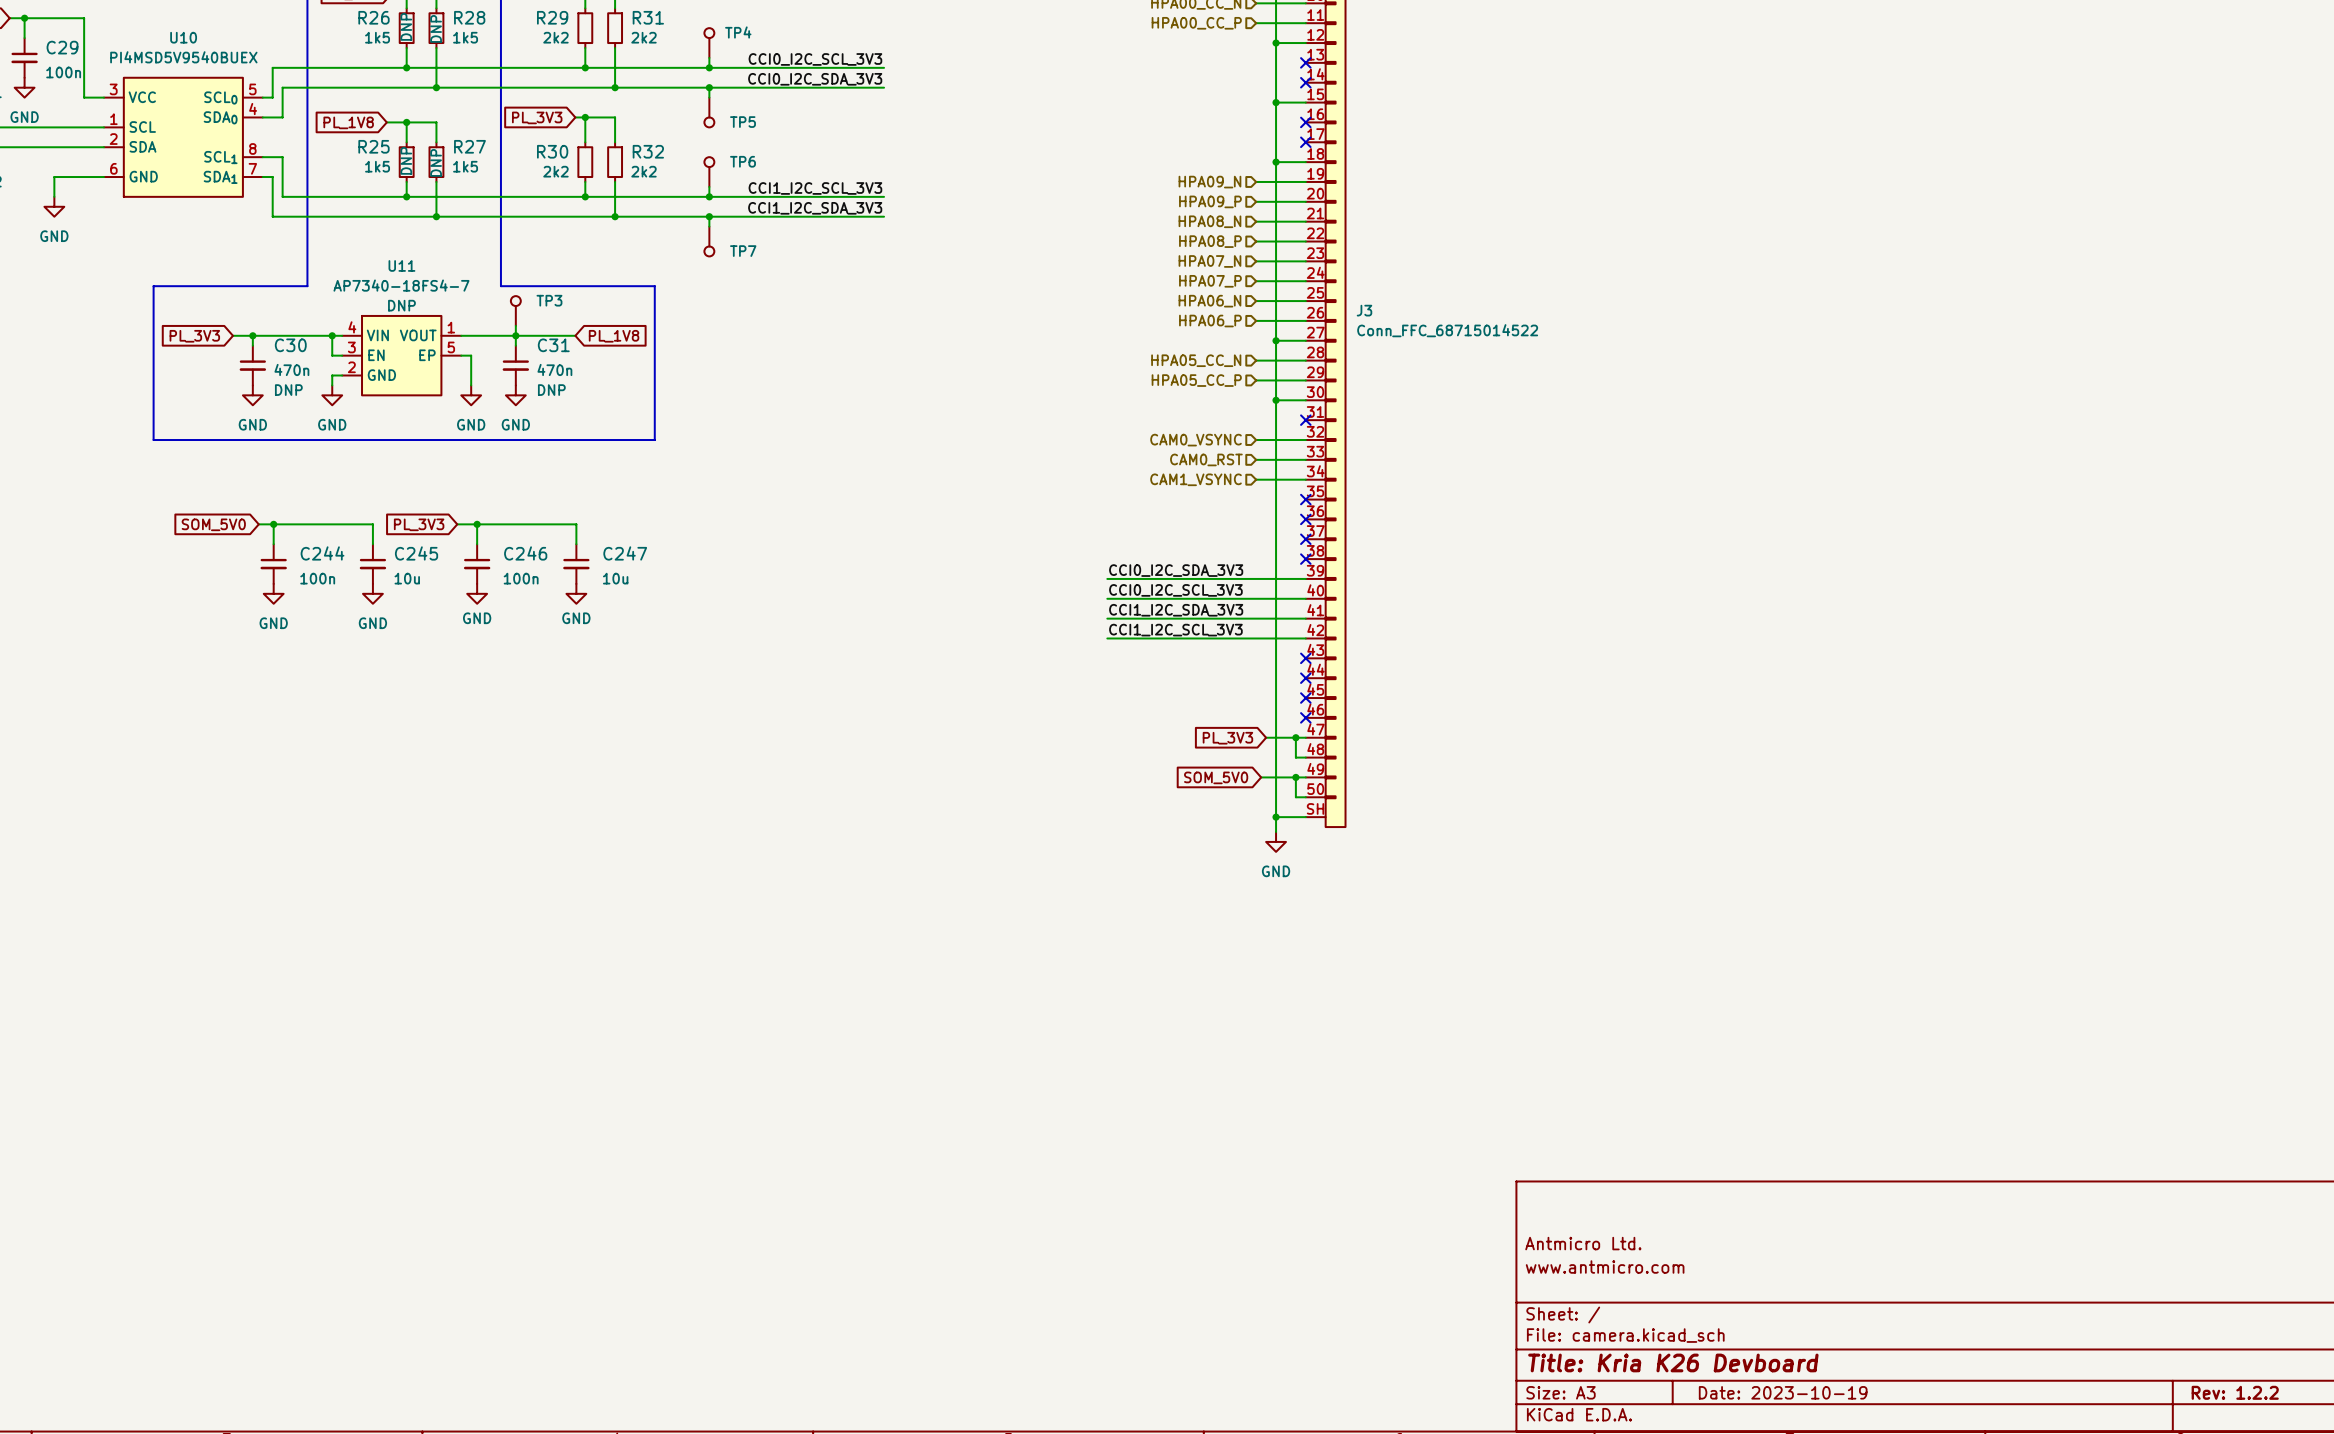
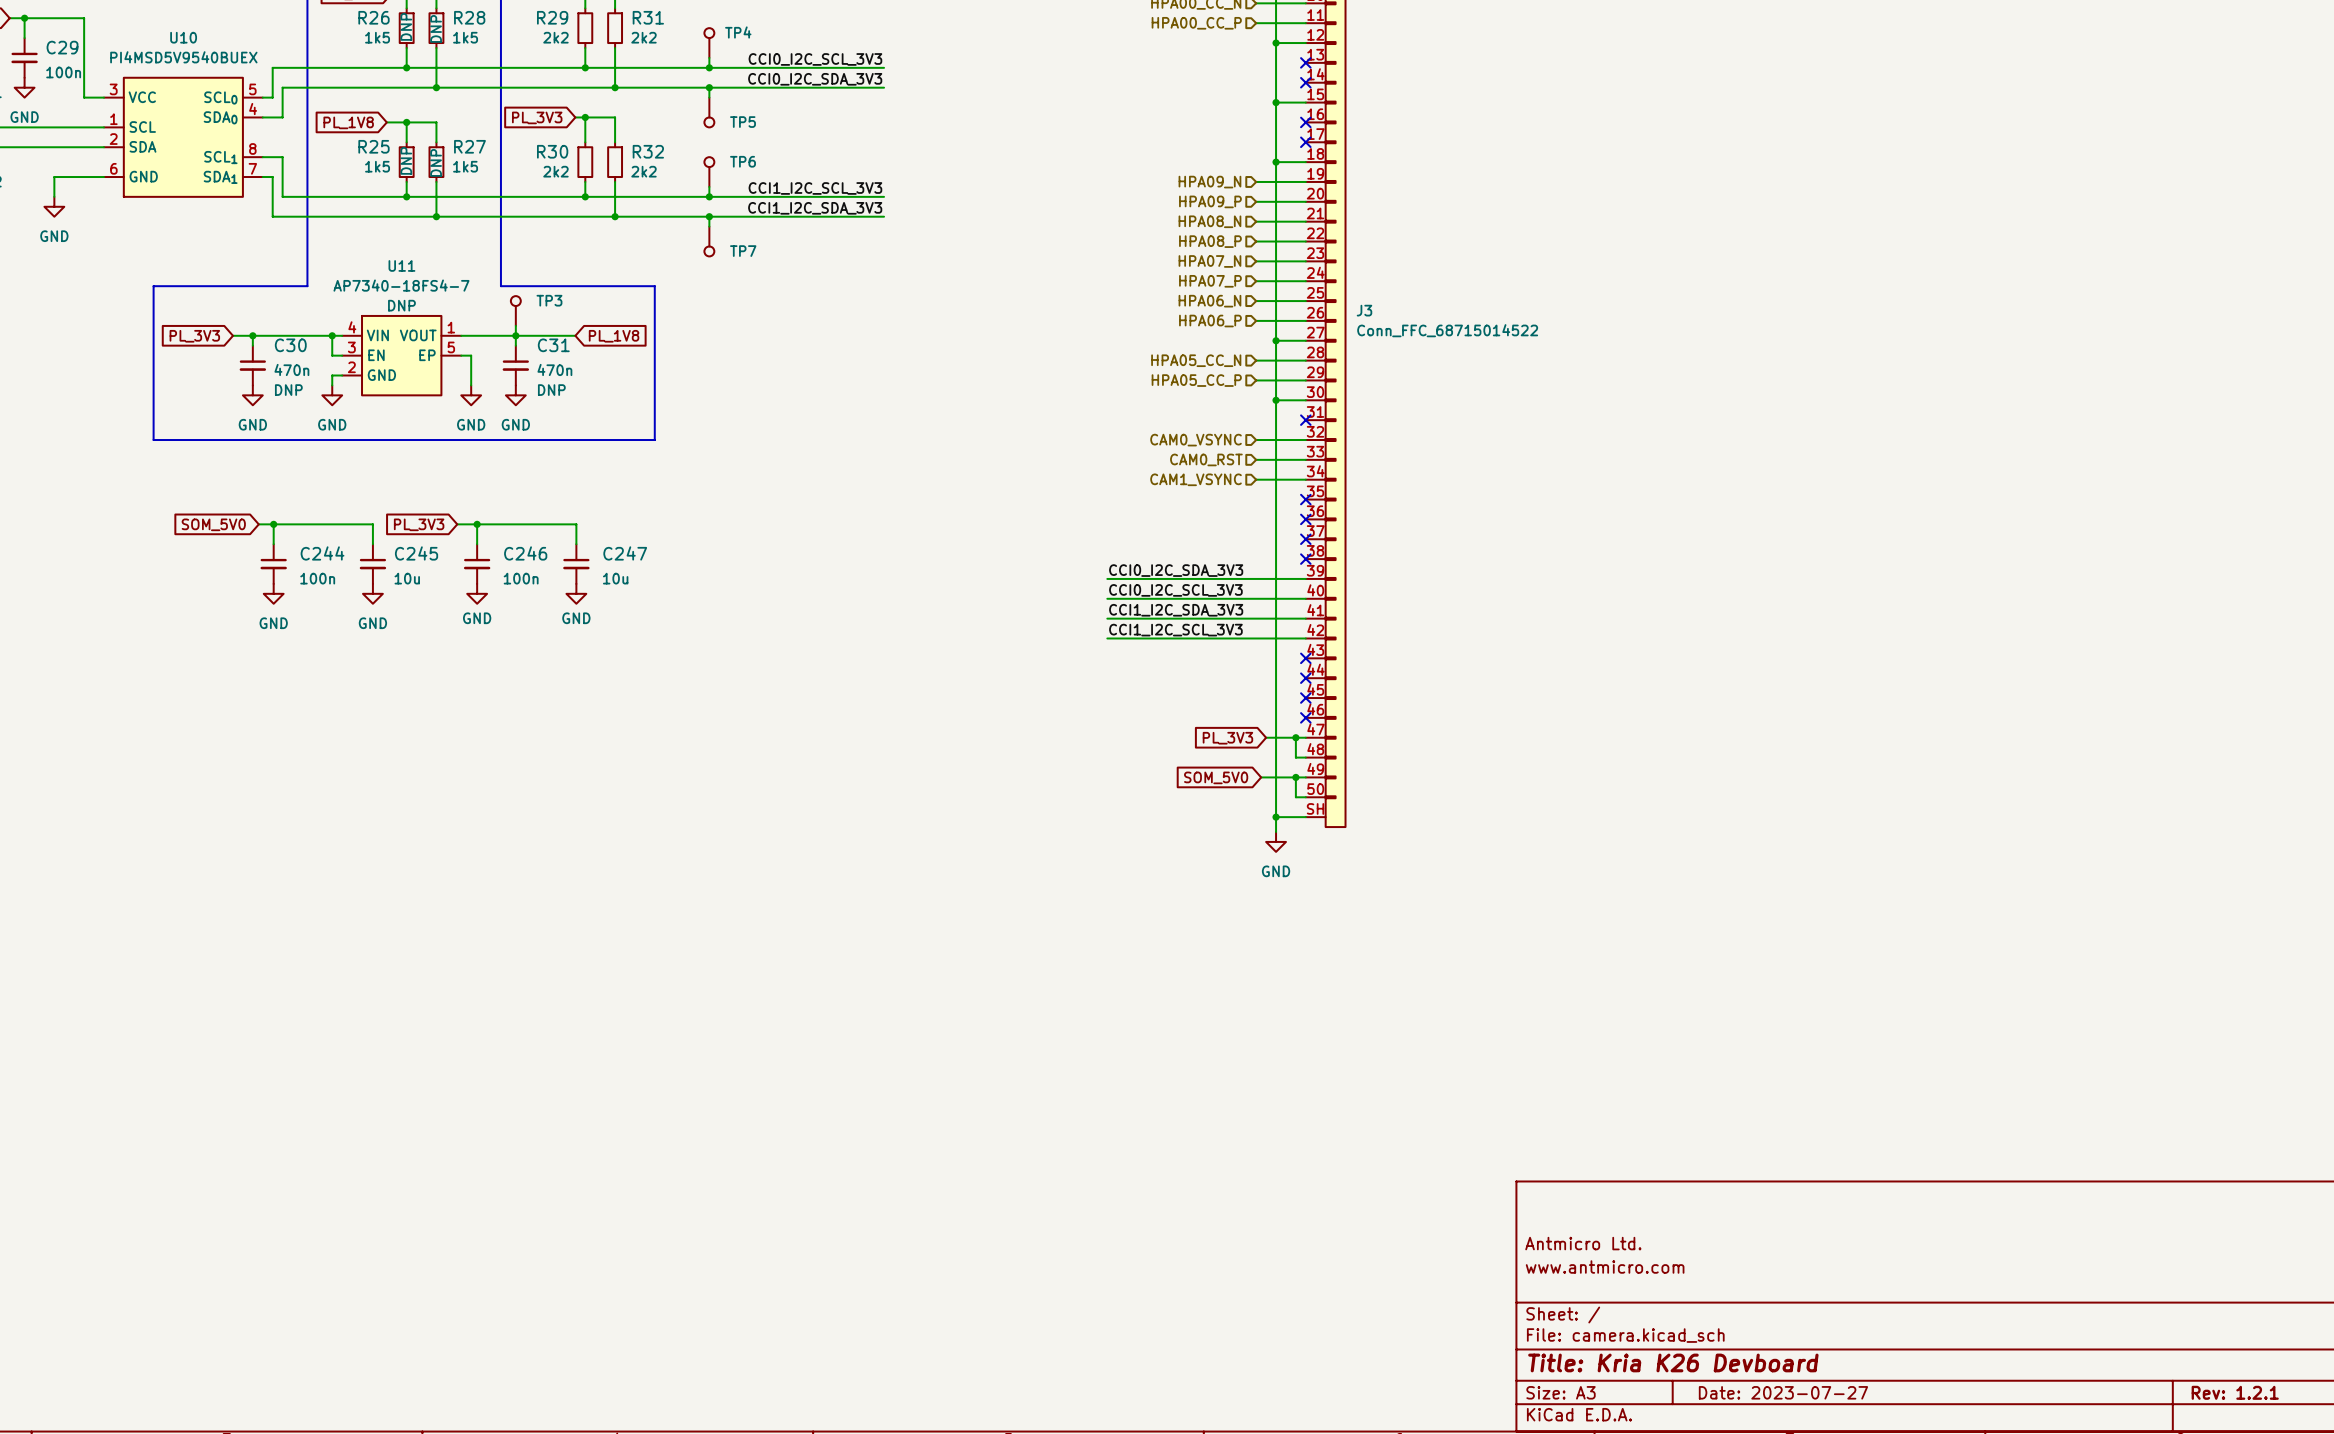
title block: Date: 2023-10-19 (1783, 1392) -> Date: 2023-07-27 (1783, 1392)
title block: Rev: 1.2.2 (2235, 1392) -> Rev: 1.2.1 (2235, 1392)

